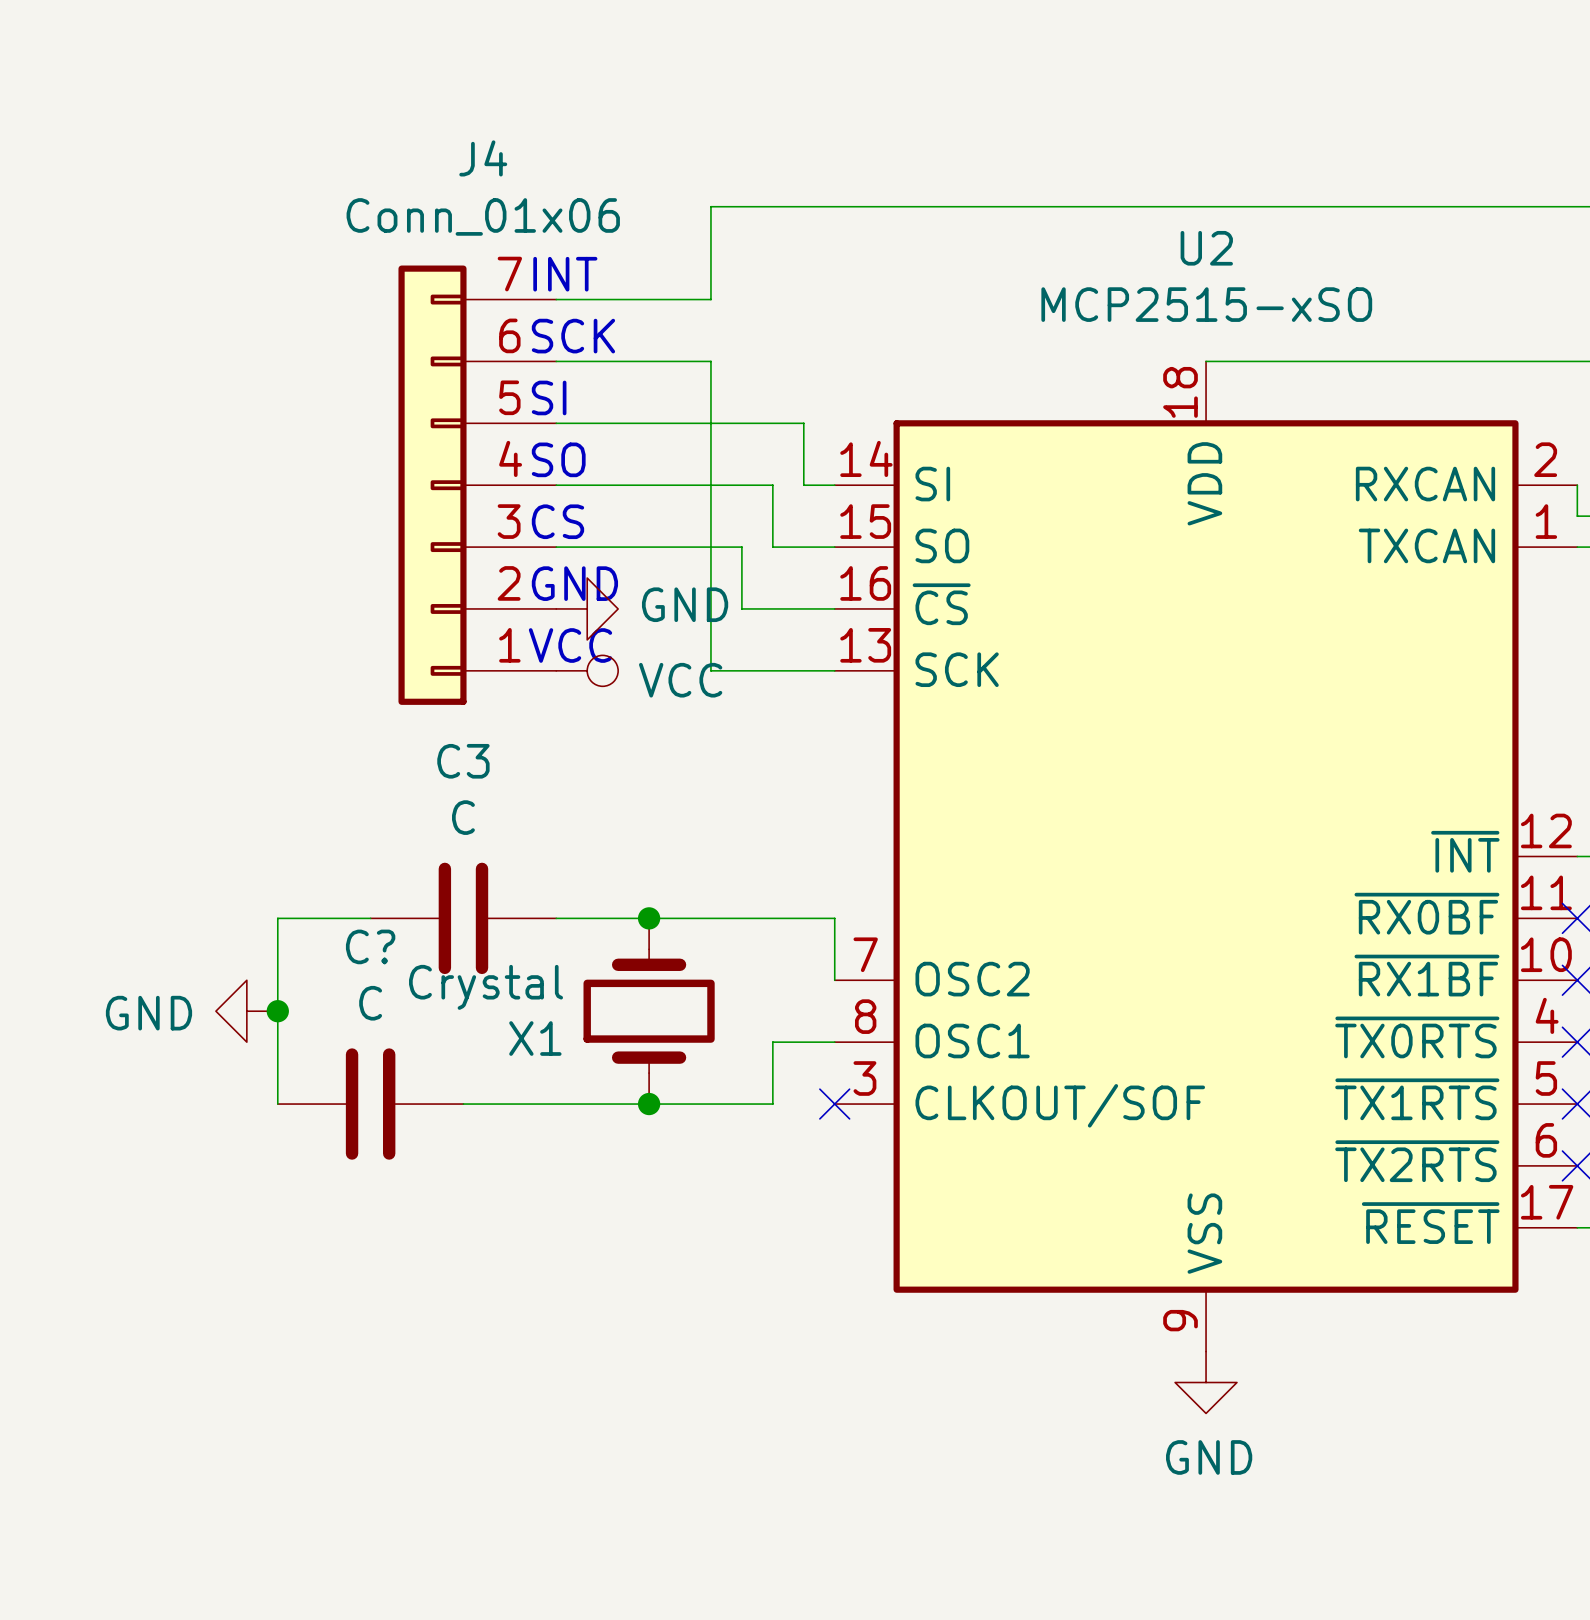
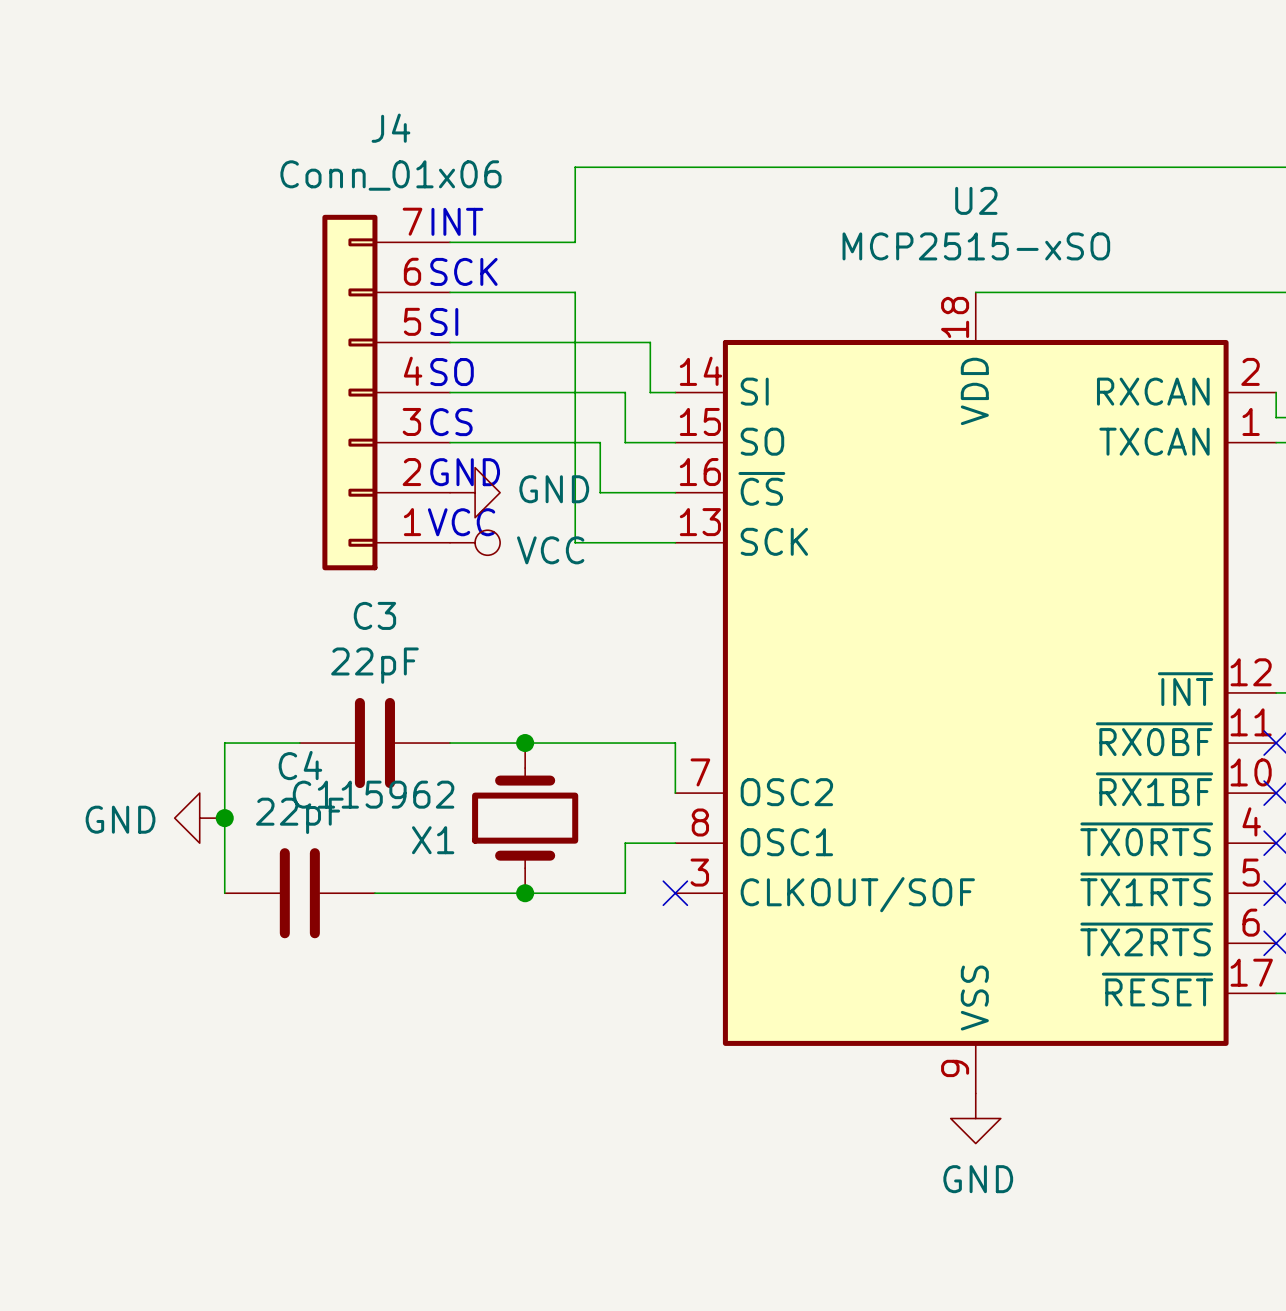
C3 value: C (463, 817) -> 22pF (374, 665)
C? name: C? (370, 946) -> C4 (300, 765)
X1 value: Crystal (486, 987) -> C115962 (373, 794)
C? value: C (370, 1003) -> 22pF (299, 815)

